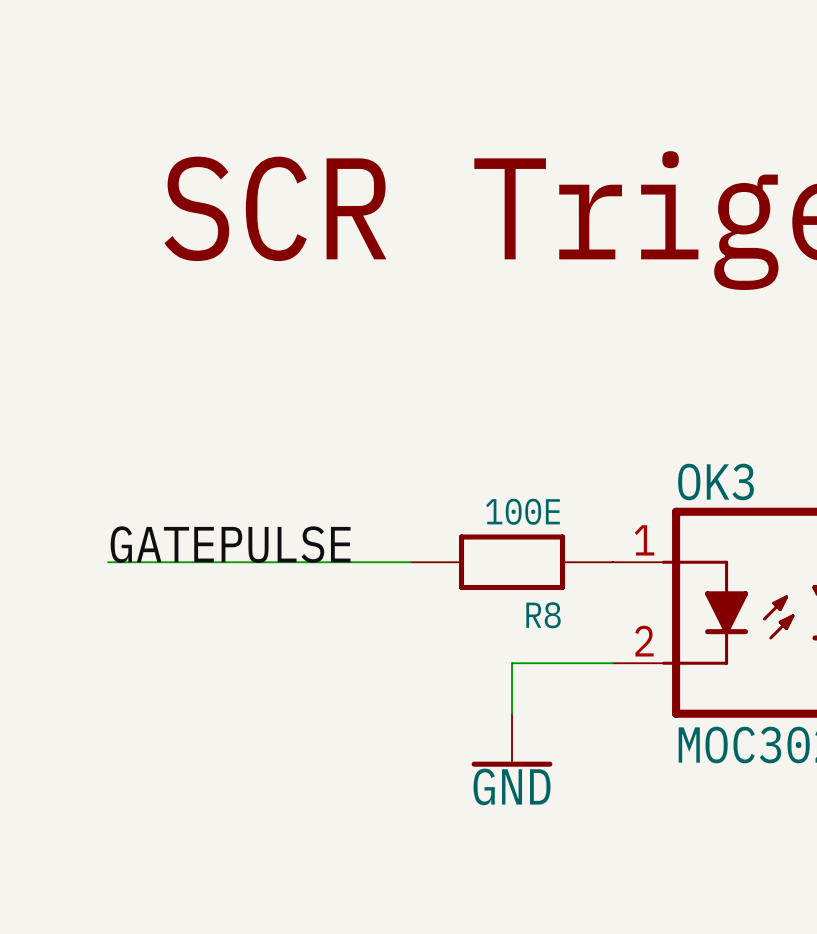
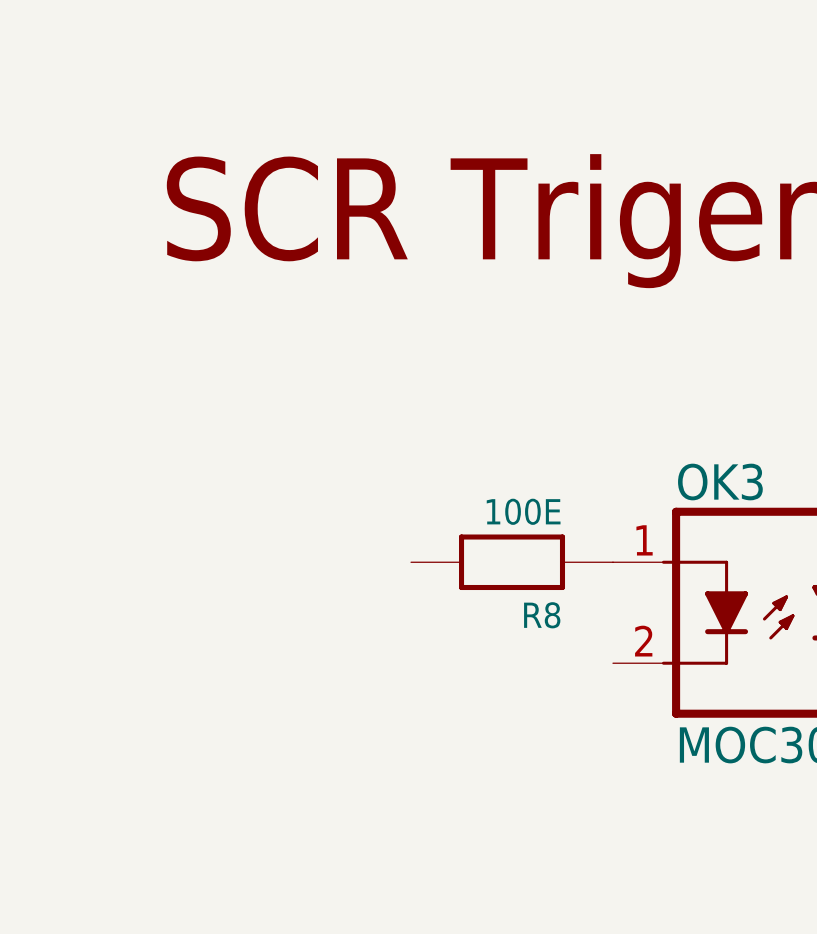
label: GATEPULSE (230, 544) -> none
wire: (108, 562) (411, 562) -> none
wire: (612, 663) (512, 663) (512, 713) -> none
power symbol: GND (512, 740) -> none

